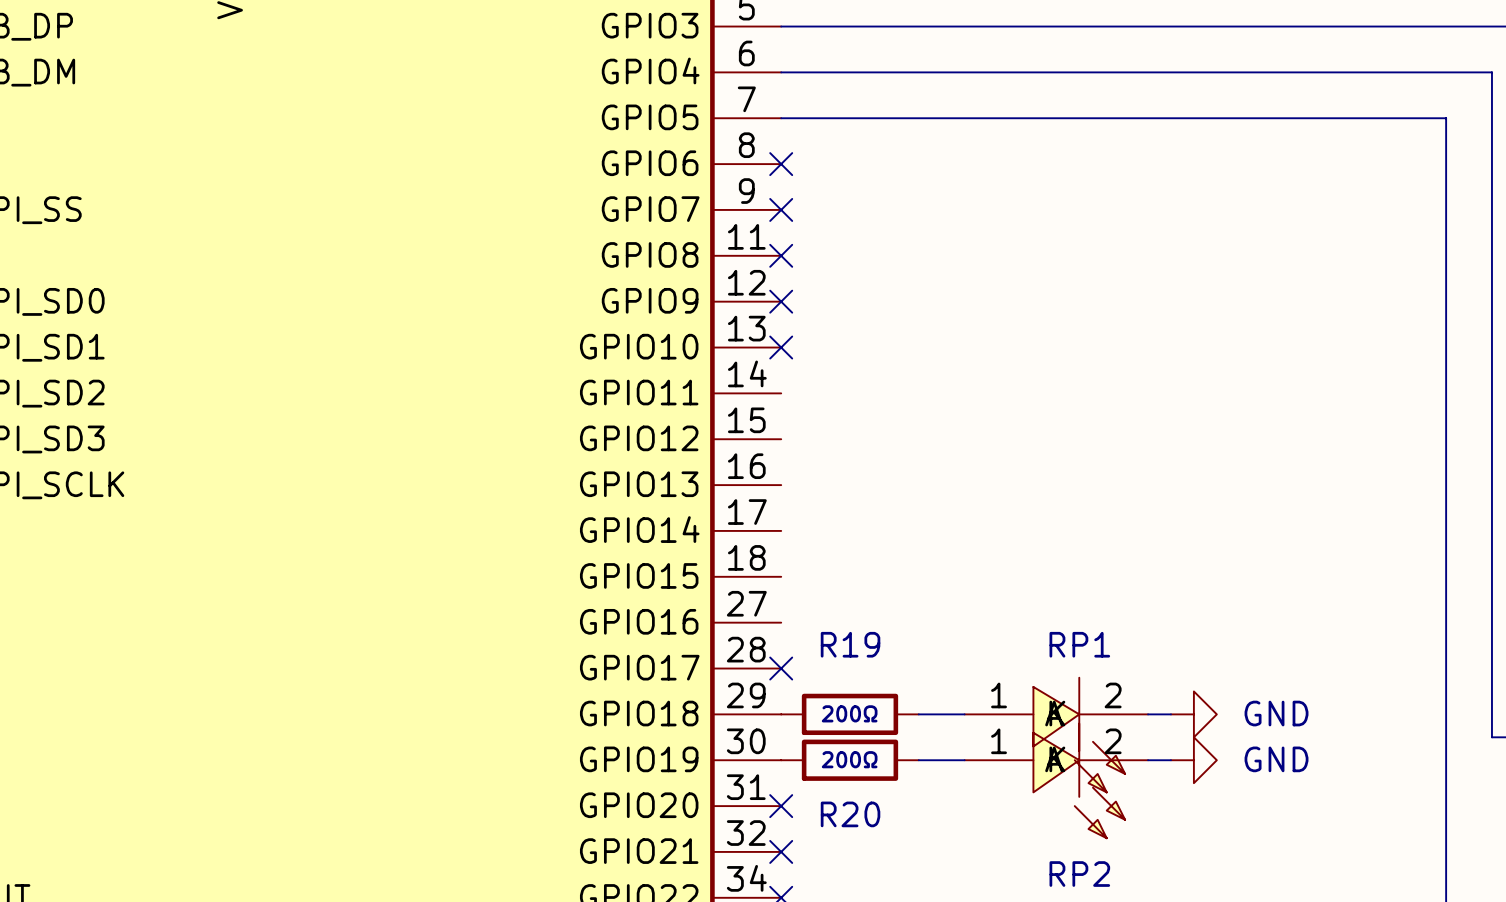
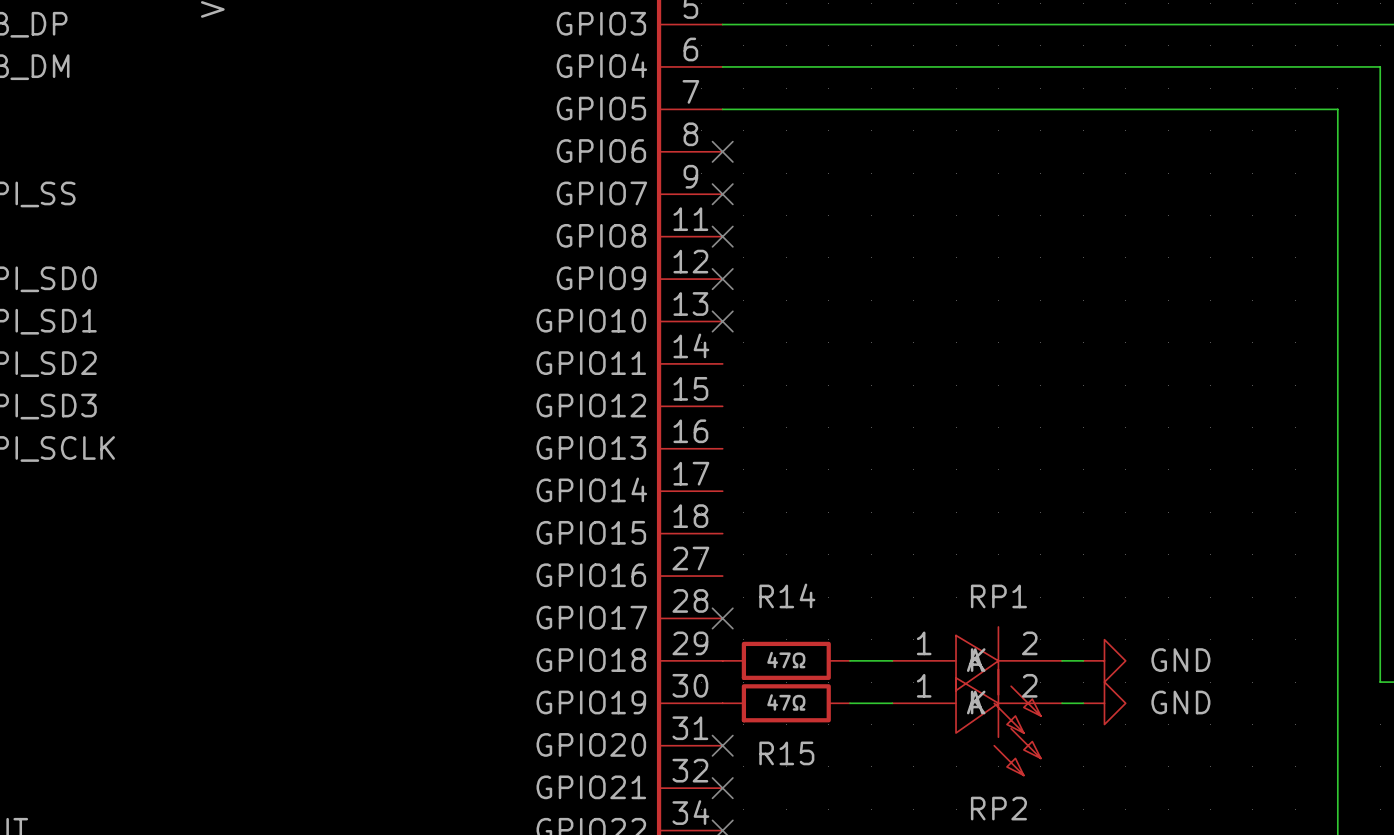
R19 name: R19 (850, 644) -> R14 (787, 595)
R19 value: 200Ω (849, 713) -> 47Ω (786, 660)
R20 value: 200Ω (849, 759) -> 47Ω (786, 702)
R20 name: R20 (850, 814) -> R15 (786, 753)

